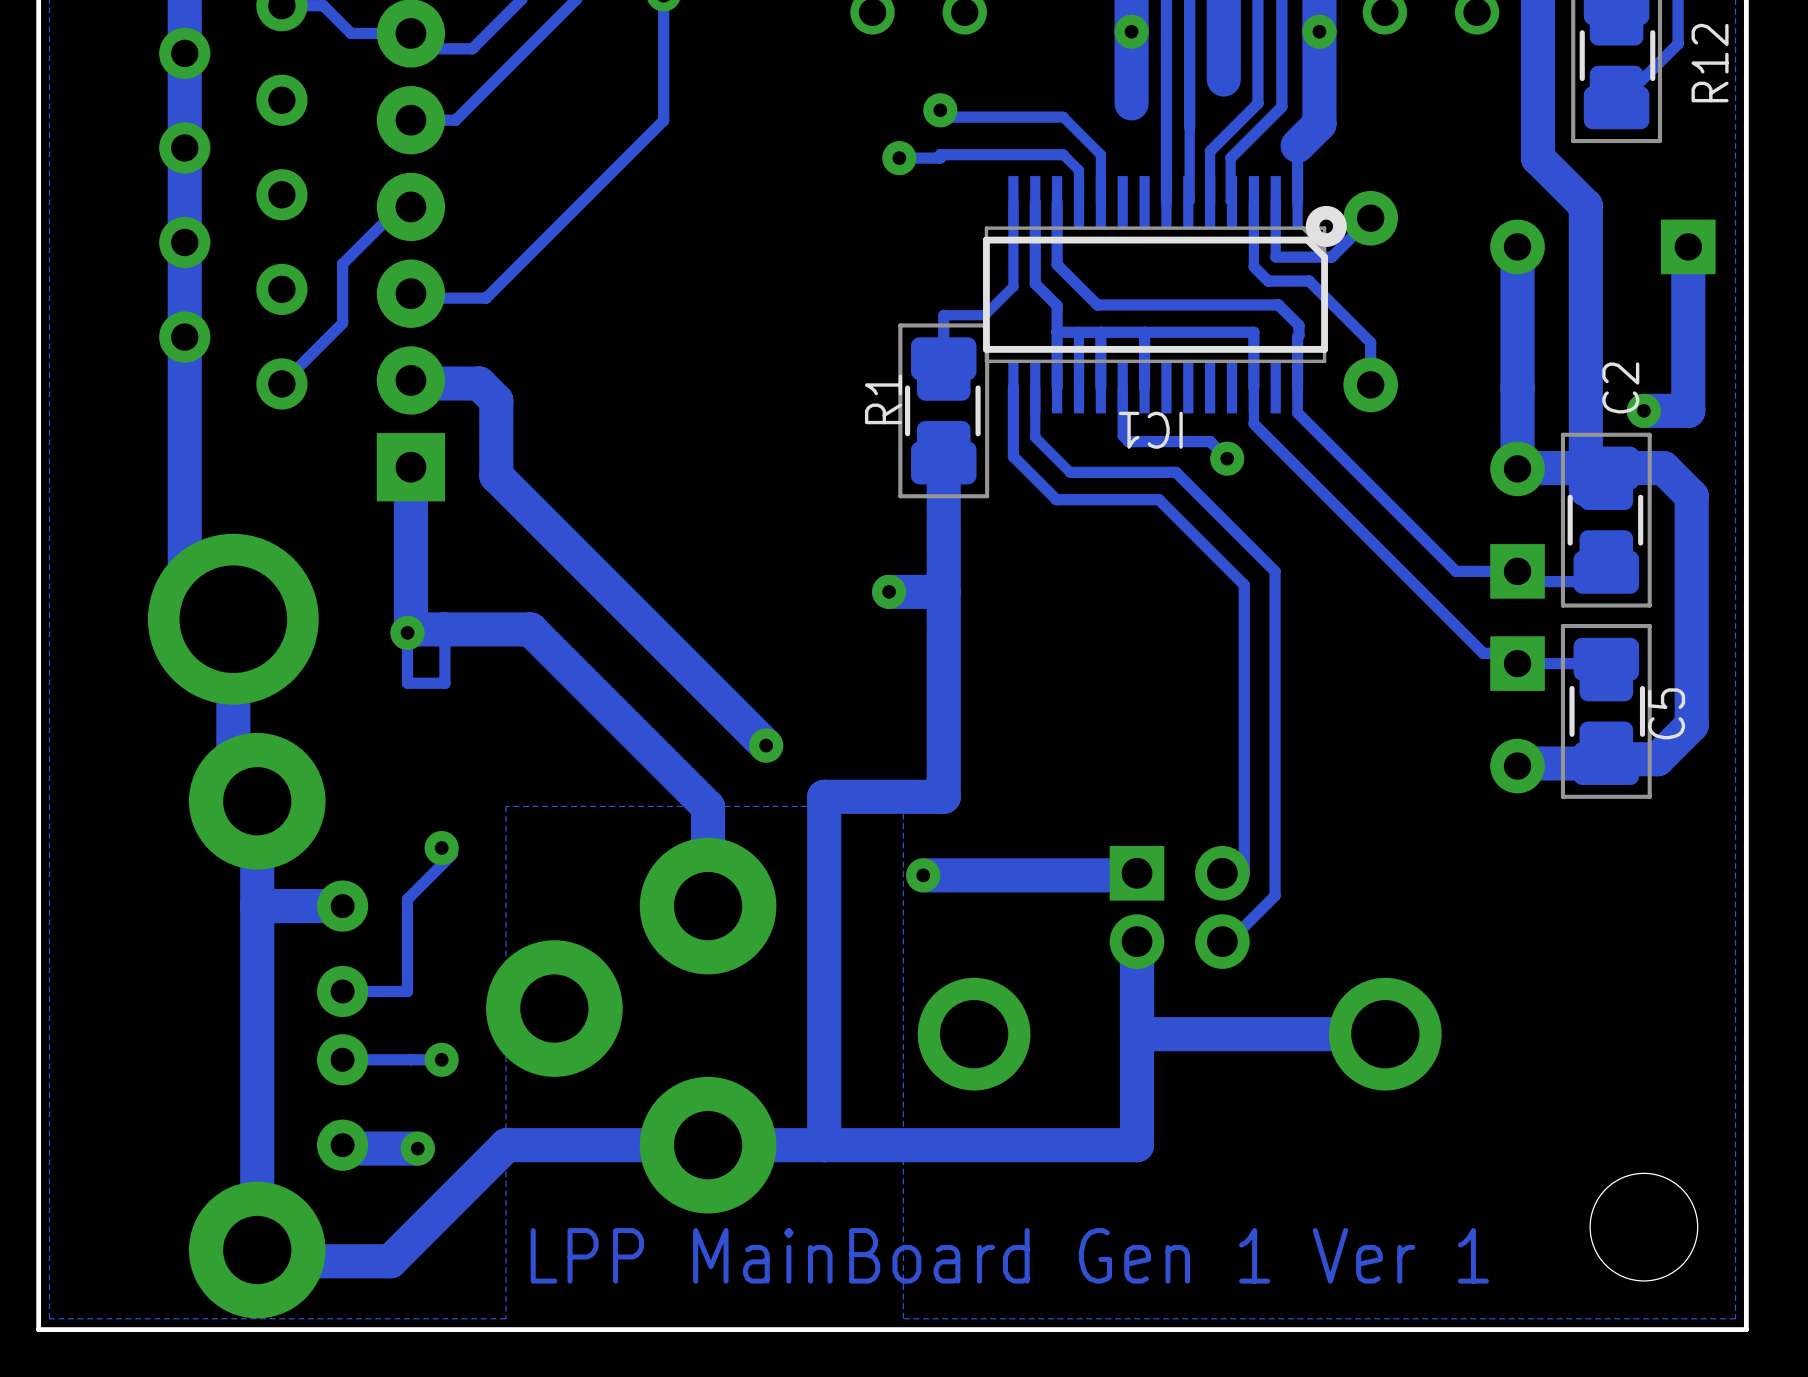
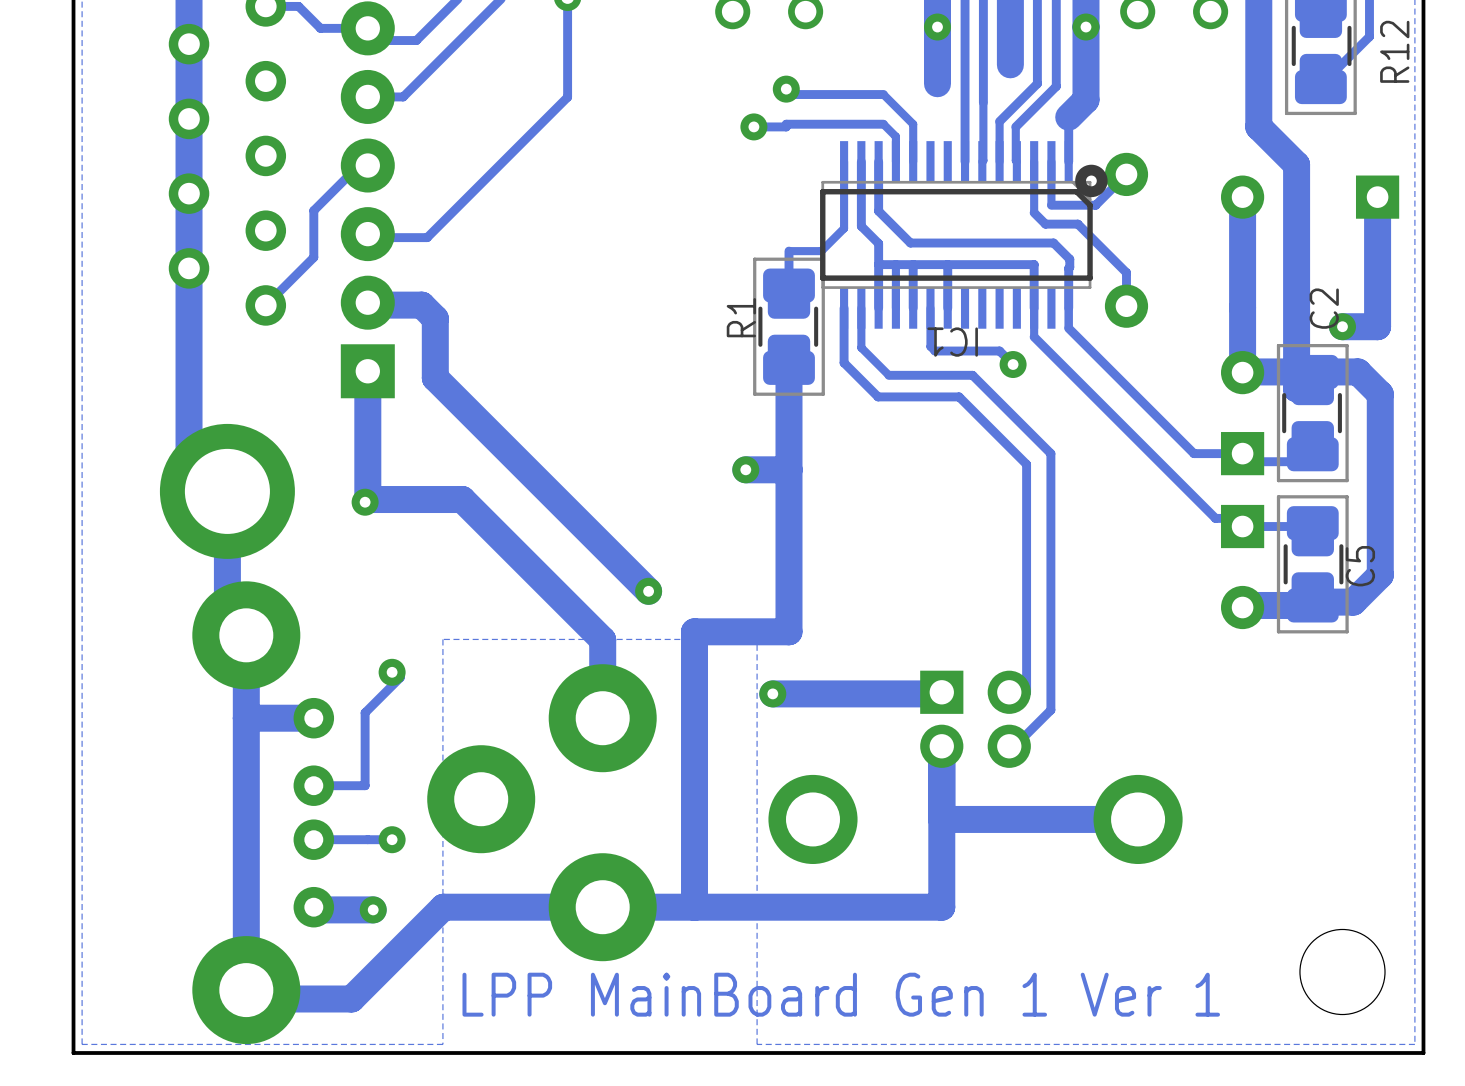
track: (444, 629) (444, 683) (407, 683) (407, 632) (410, 629) -> none

